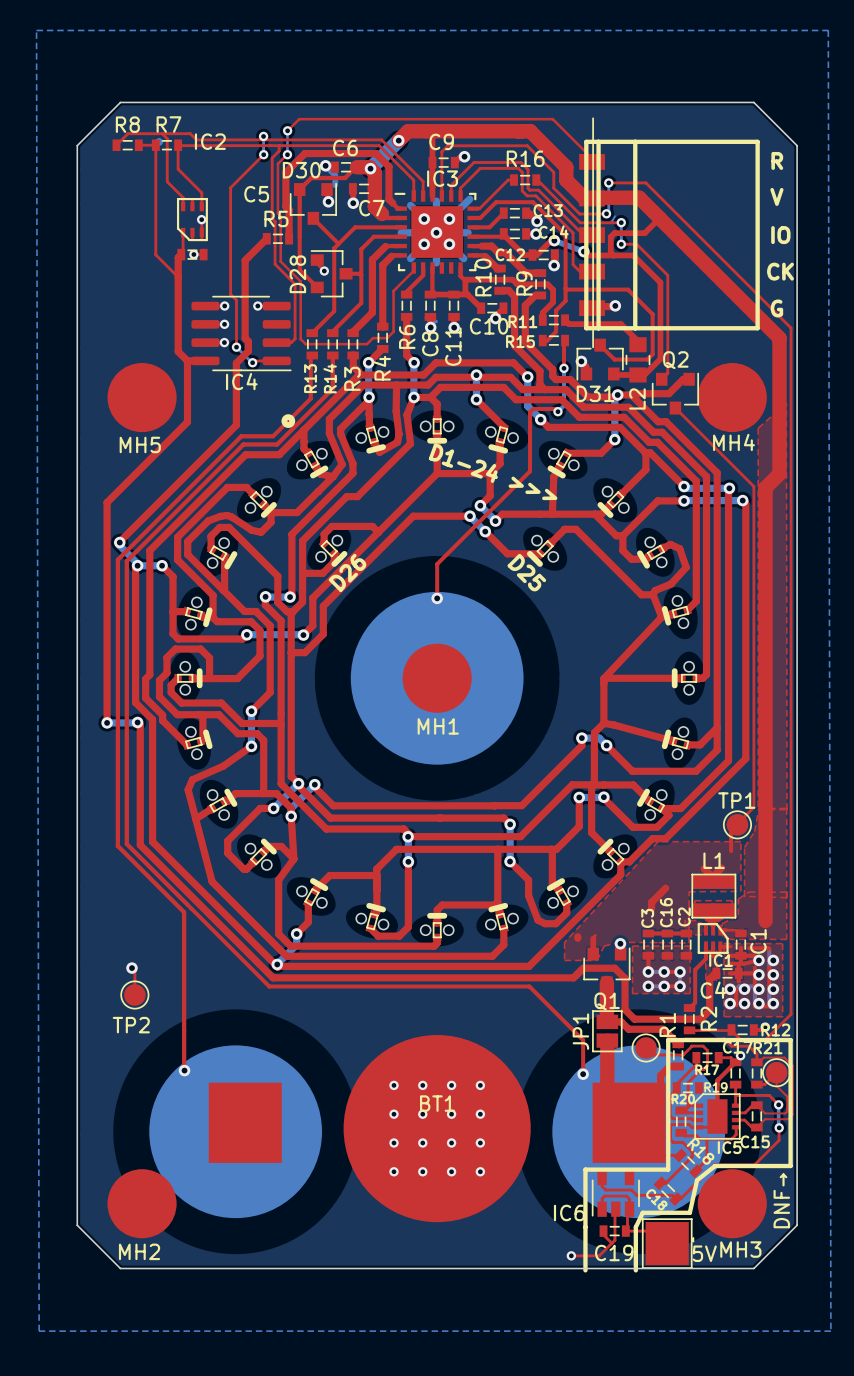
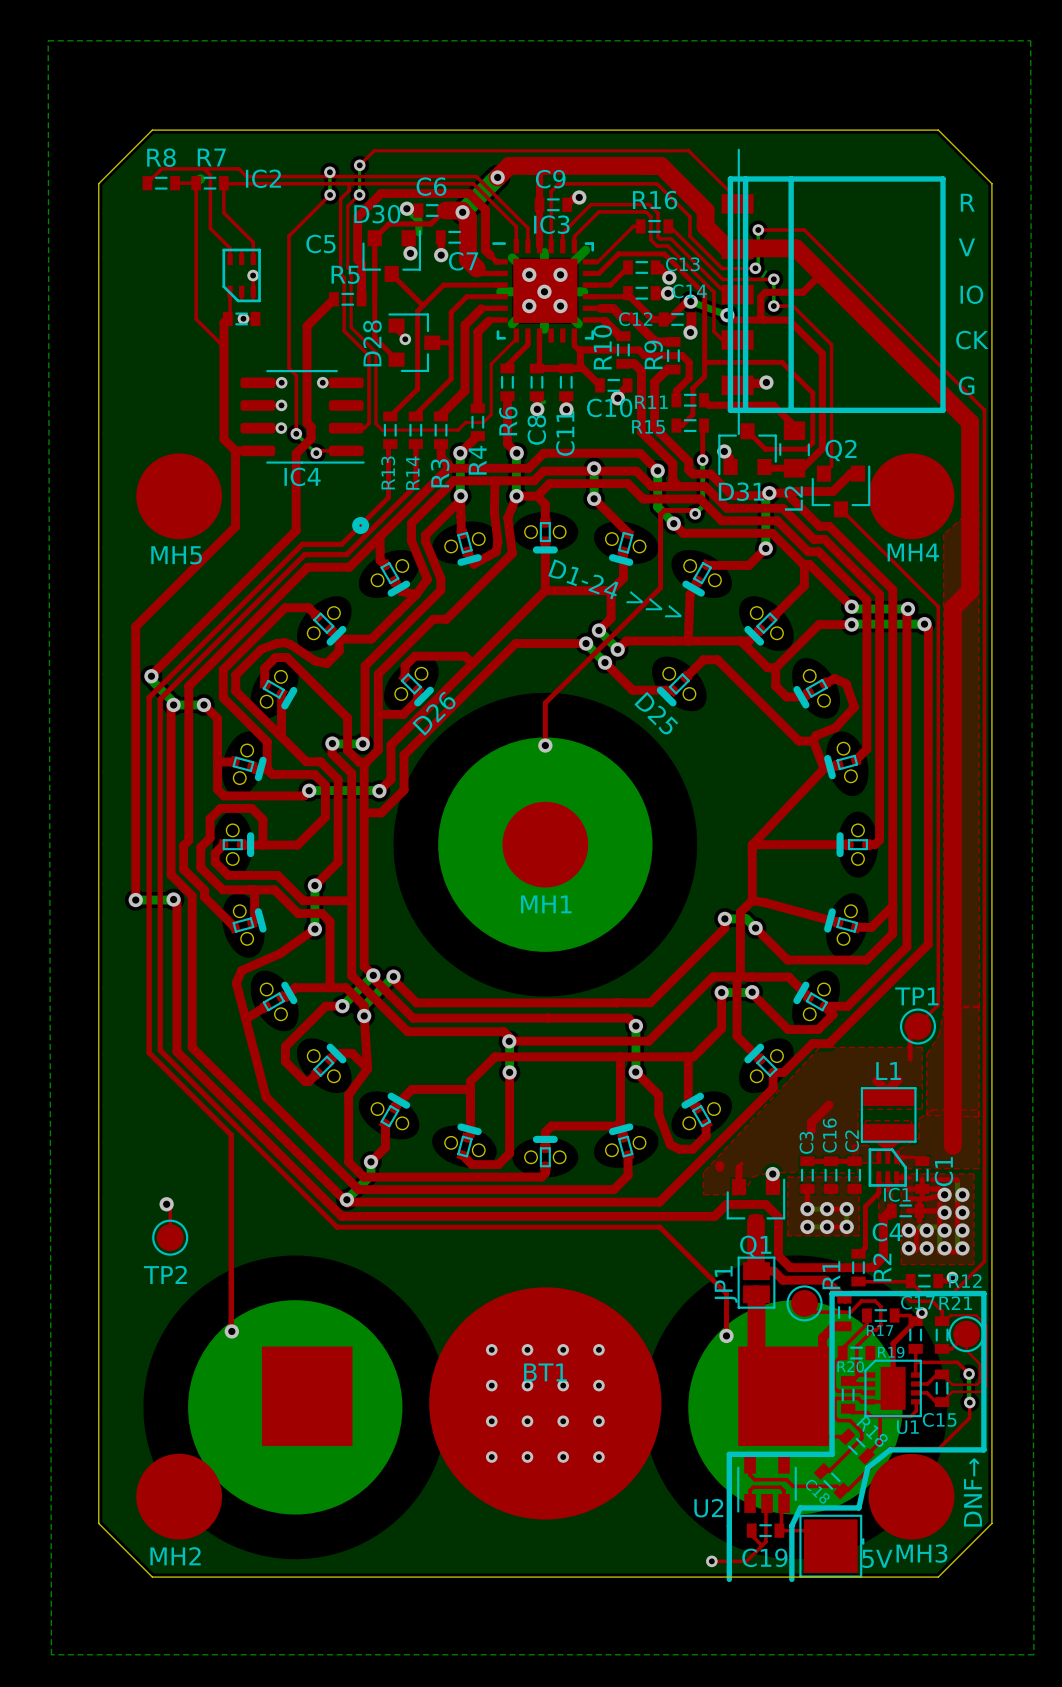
IC5 name: IC5 (729, 1147) -> U1 (907, 1427)
IC6 name: IC6 (569, 1212) -> U2 (708, 1508)

